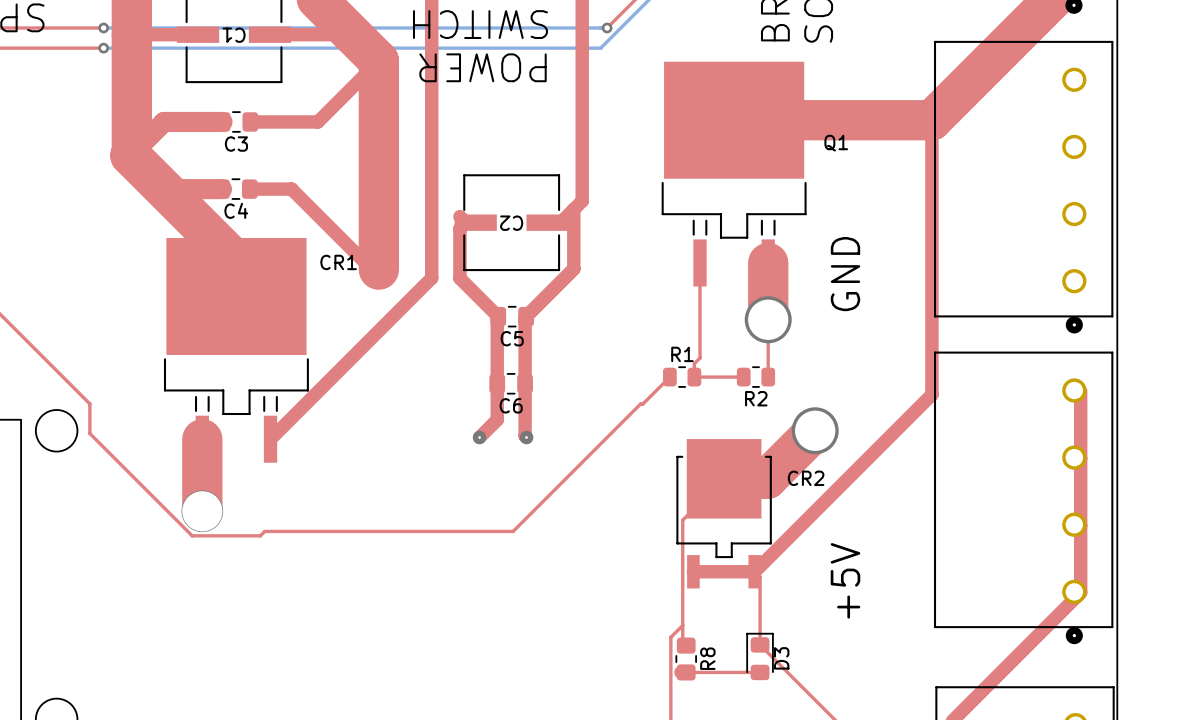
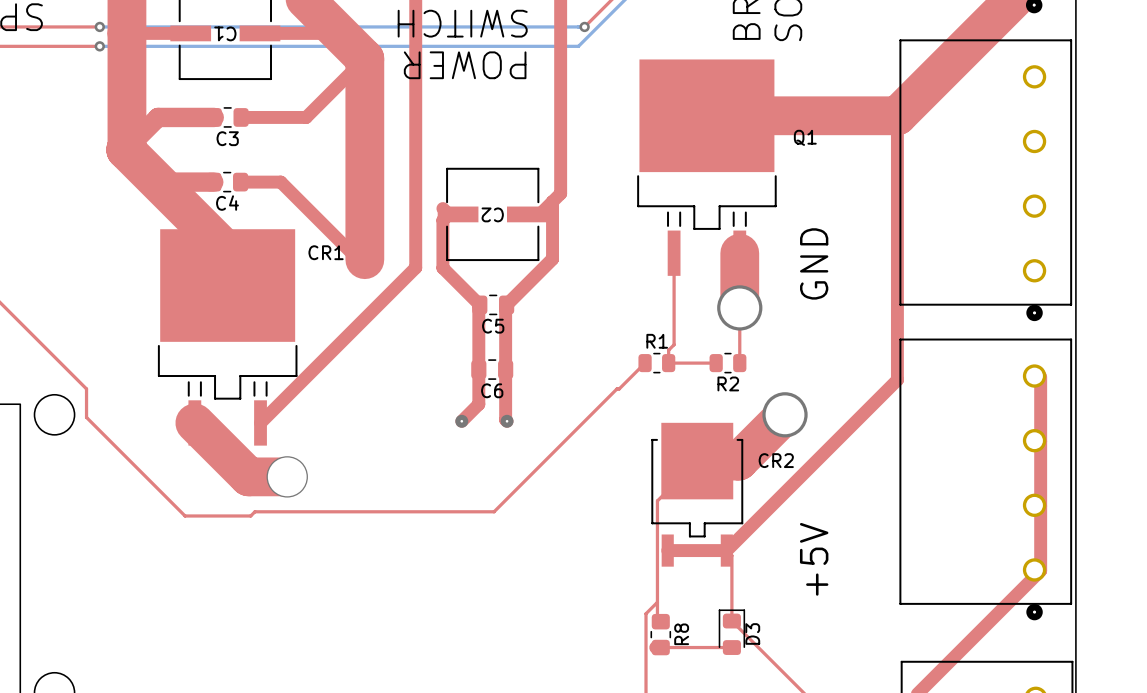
top track: (202, 439) (202, 511) -> (194, 422) (248, 476) (287, 476)
via: none -> (287, 476)
via: (202, 511) -> none

